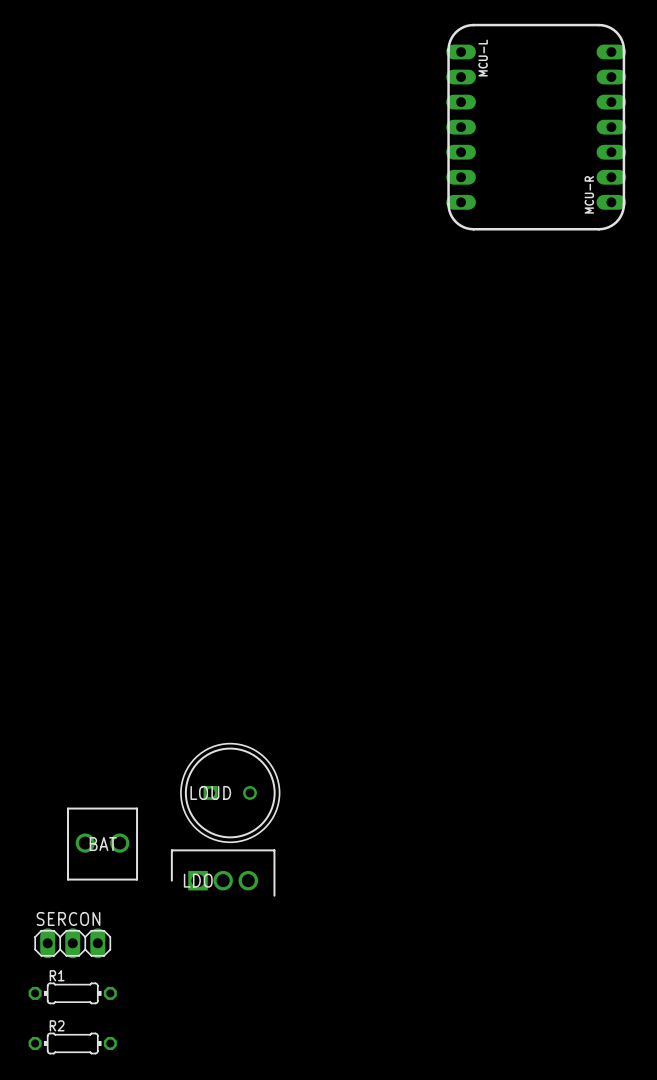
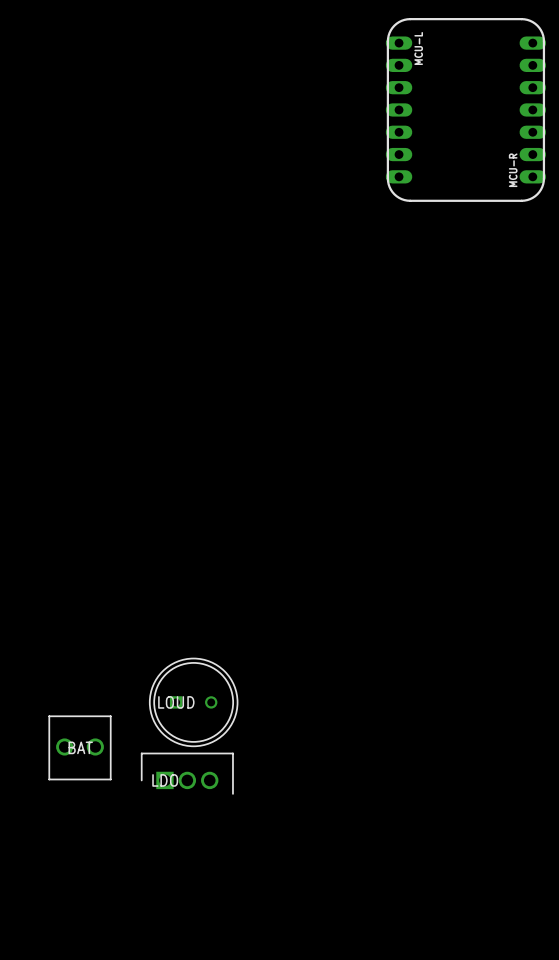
SERCON: (72, 943) -> none
R1: (72, 993) -> none
R2: (72, 1043) -> none

